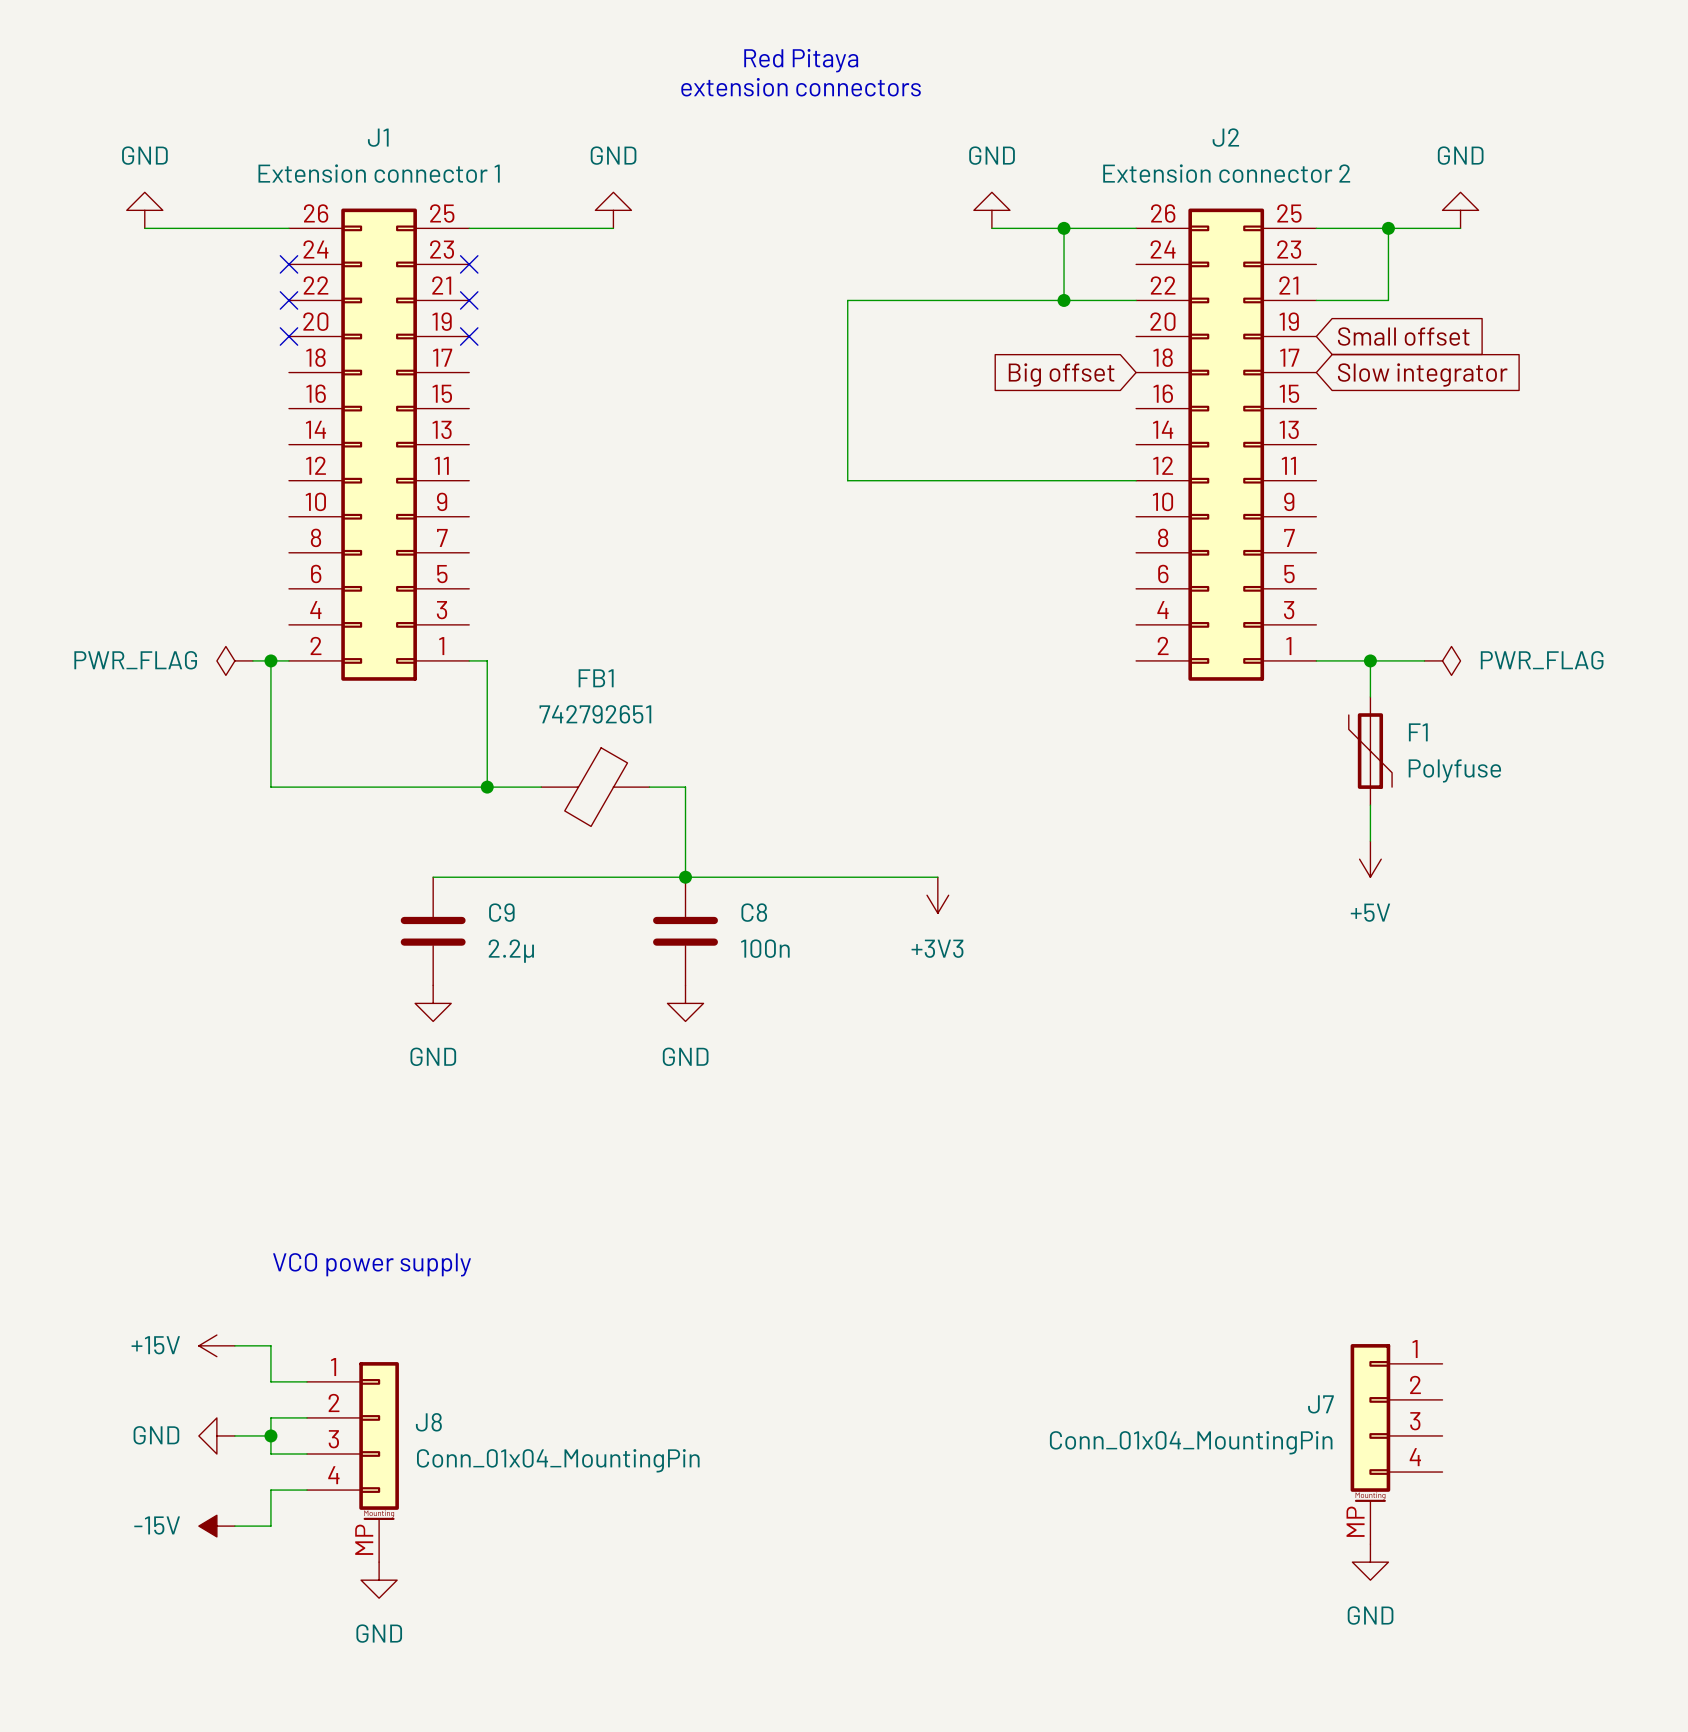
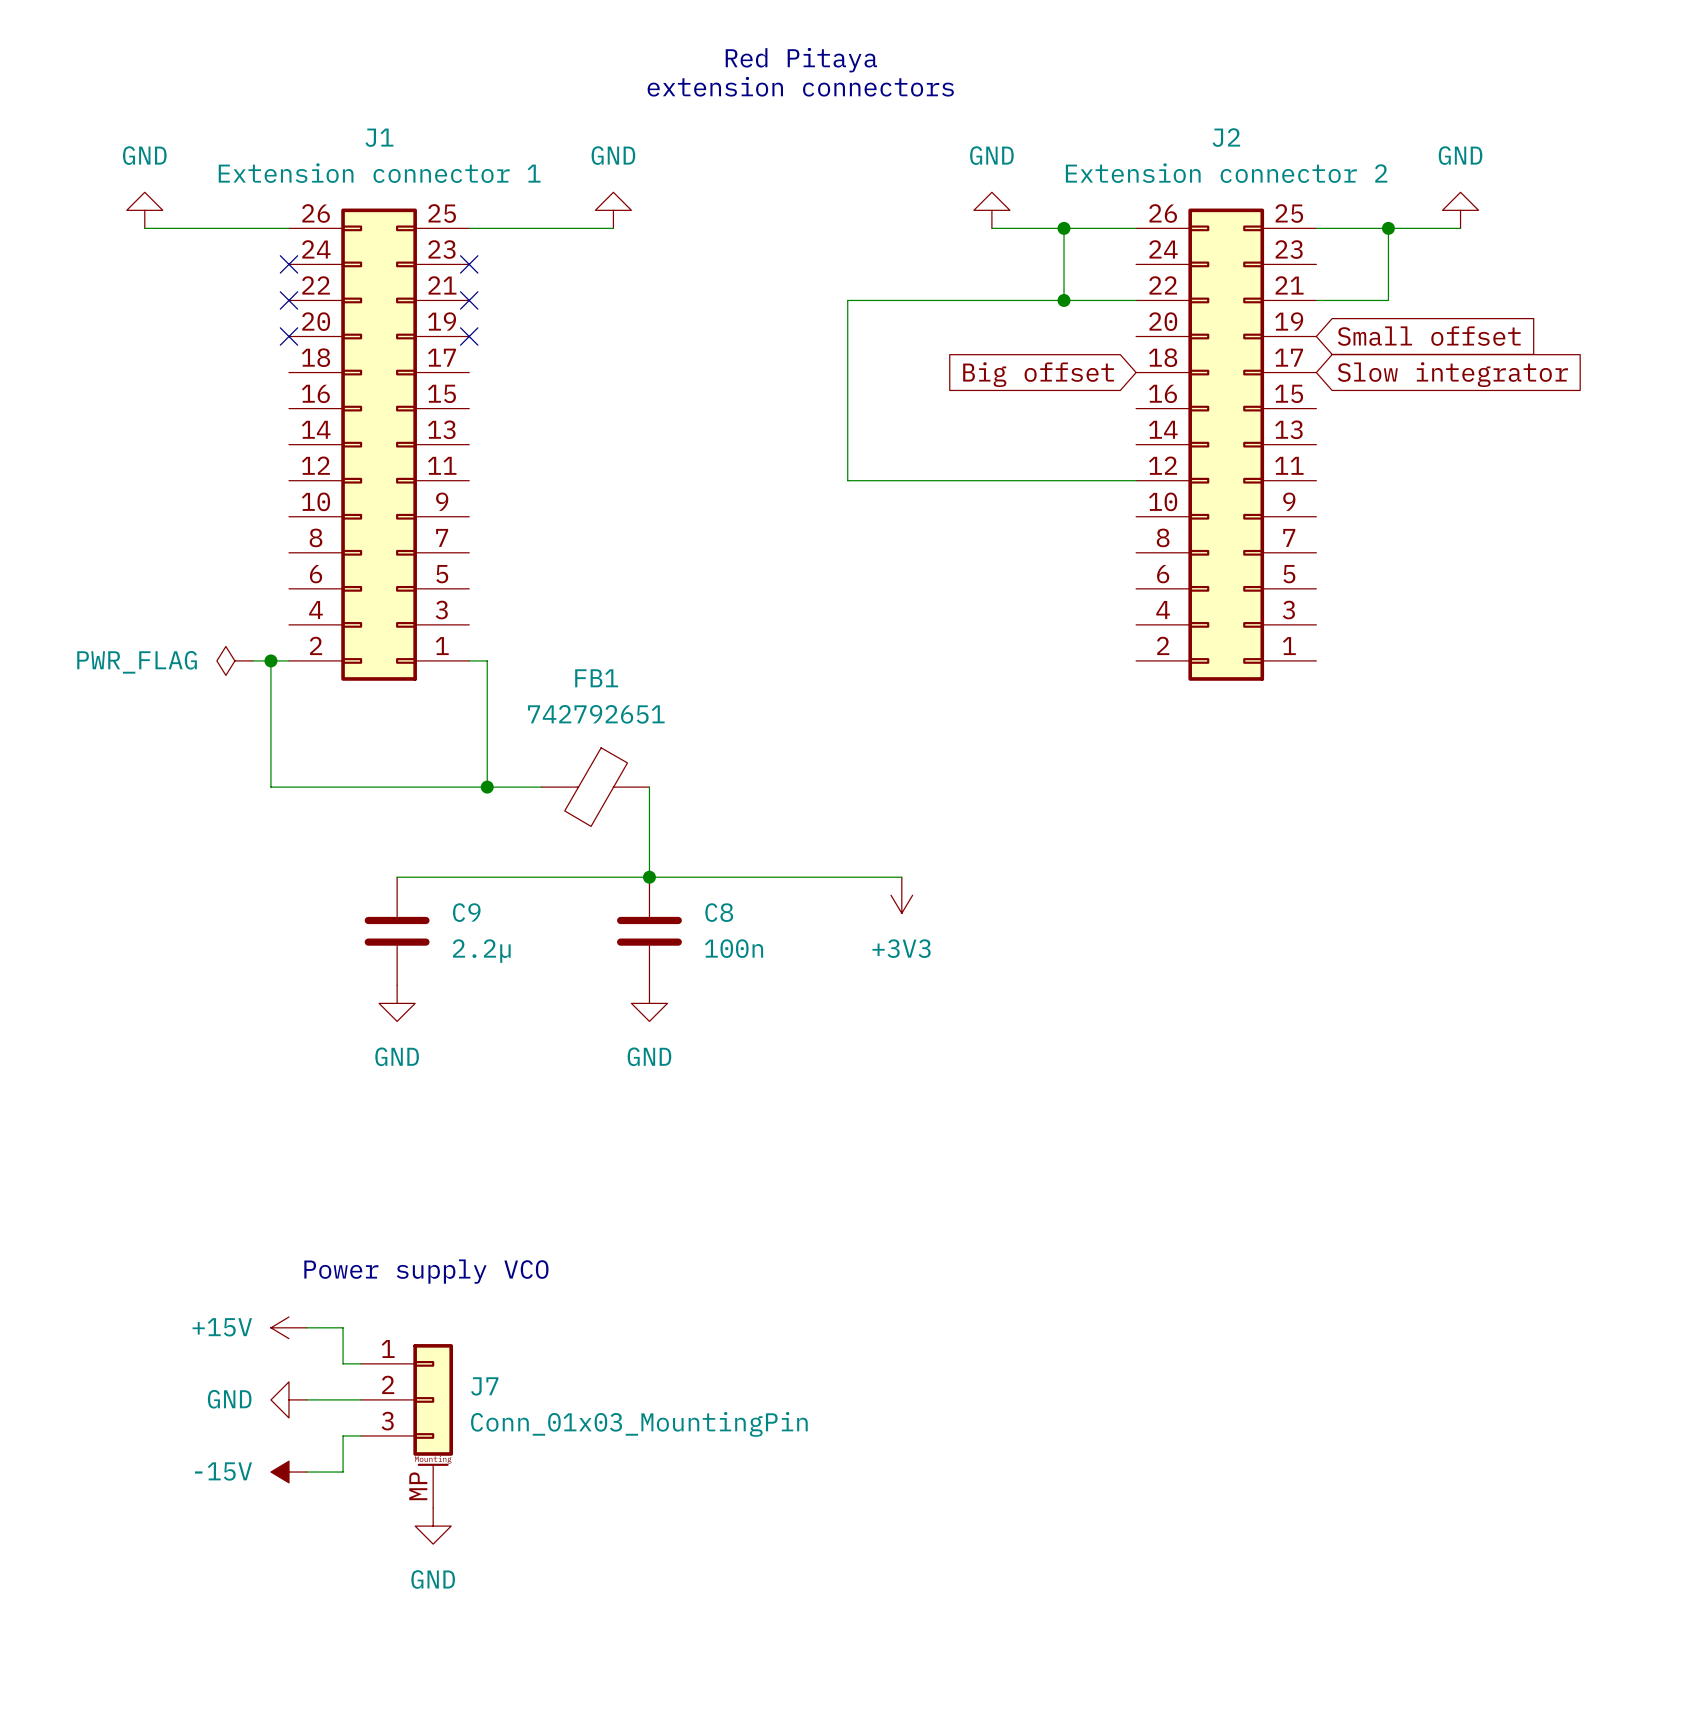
wire: (1316, 660) (1424, 660) -> none
wire: (1370, 660) (1370, 696) -> none
junction: (1370, 660) -> none
power symbol: PWR_FLAG (1442, 660) -> none
F1: Polyfuse (1370, 751) -> none
wire: (649, 787) (685, 787) (685, 877) -> (649, 787) (649, 877)
wire: (1370, 805) (1370, 841) -> none
power symbol: +5V (1370, 859) -> none
wire: none -> (397, 877) (433, 877)
junction position: (685, 877) -> (649, 877)
wire: (901, 877) (937, 877) -> none
power symbol position: +3V3 (937, 895) -> +3V3 (901, 895)
C9 position: (433, 931) -> (397, 931)
C8 position: (685, 931) -> (649, 931)
power symbol position: GND (433, 1003) -> GND (397, 1003)
power symbol position: GND (685, 1003) -> GND (649, 1003)
text: VCO power supply (372, 1264) -> Power supply VCO (426, 1271)
wire: none -> (307, 1327) (343, 1327) (343, 1363) (361, 1363)
J7 symbol: [1350, 1344, 1443, 1545] -> [361, 1344, 454, 1509]
power symbol position: +15V (216, 1345) -> +15V (288, 1327)
wire: (234, 1345) (270, 1345) (270, 1381) (307, 1381) -> none
wire: none -> (307, 1399) (361, 1399)
J7 name position: J7 (1320, 1404) -> J7 (484, 1386)
wire: (307, 1417) (270, 1417) (270, 1453) (307, 1453) -> none
power symbol position: GND (216, 1435) -> GND (288, 1399)
wire: (234, 1435) (270, 1435) -> none
junction: (270, 1435) -> none
wire: none -> (361, 1435) (343, 1435) (343, 1472) (307, 1472)
J7 value: Conn_01x04_MountingPin (1191, 1442) -> Conn_01x03_MountingPin (639, 1424)
J8: Conn_01x04_MountingPin (352, 1462) -> none
wire: (307, 1490) (270, 1490) (270, 1526) (234, 1526) -> none
power symbol position: -15V (216, 1526) -> -15V (288, 1472)
power symbol: GND (1370, 1562) -> none
power symbol position: GND (379, 1580) -> GND (433, 1526)

